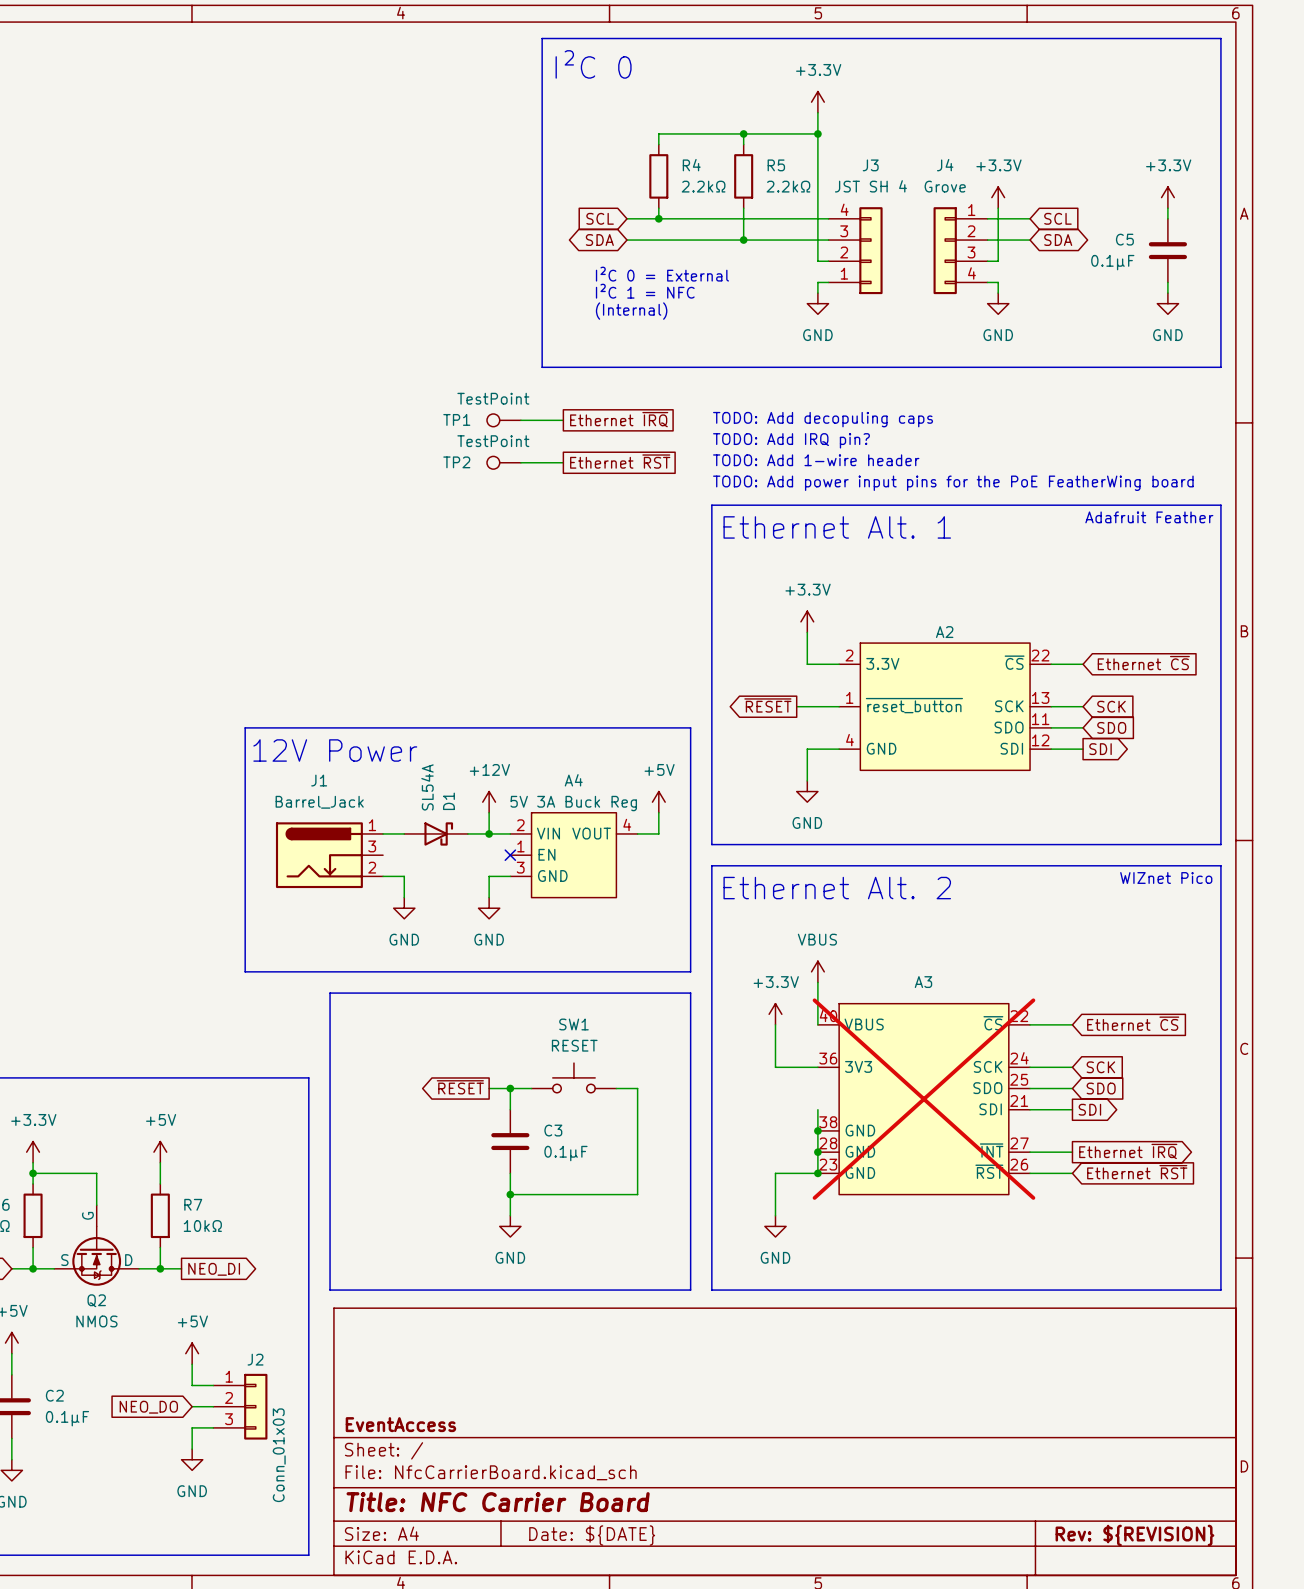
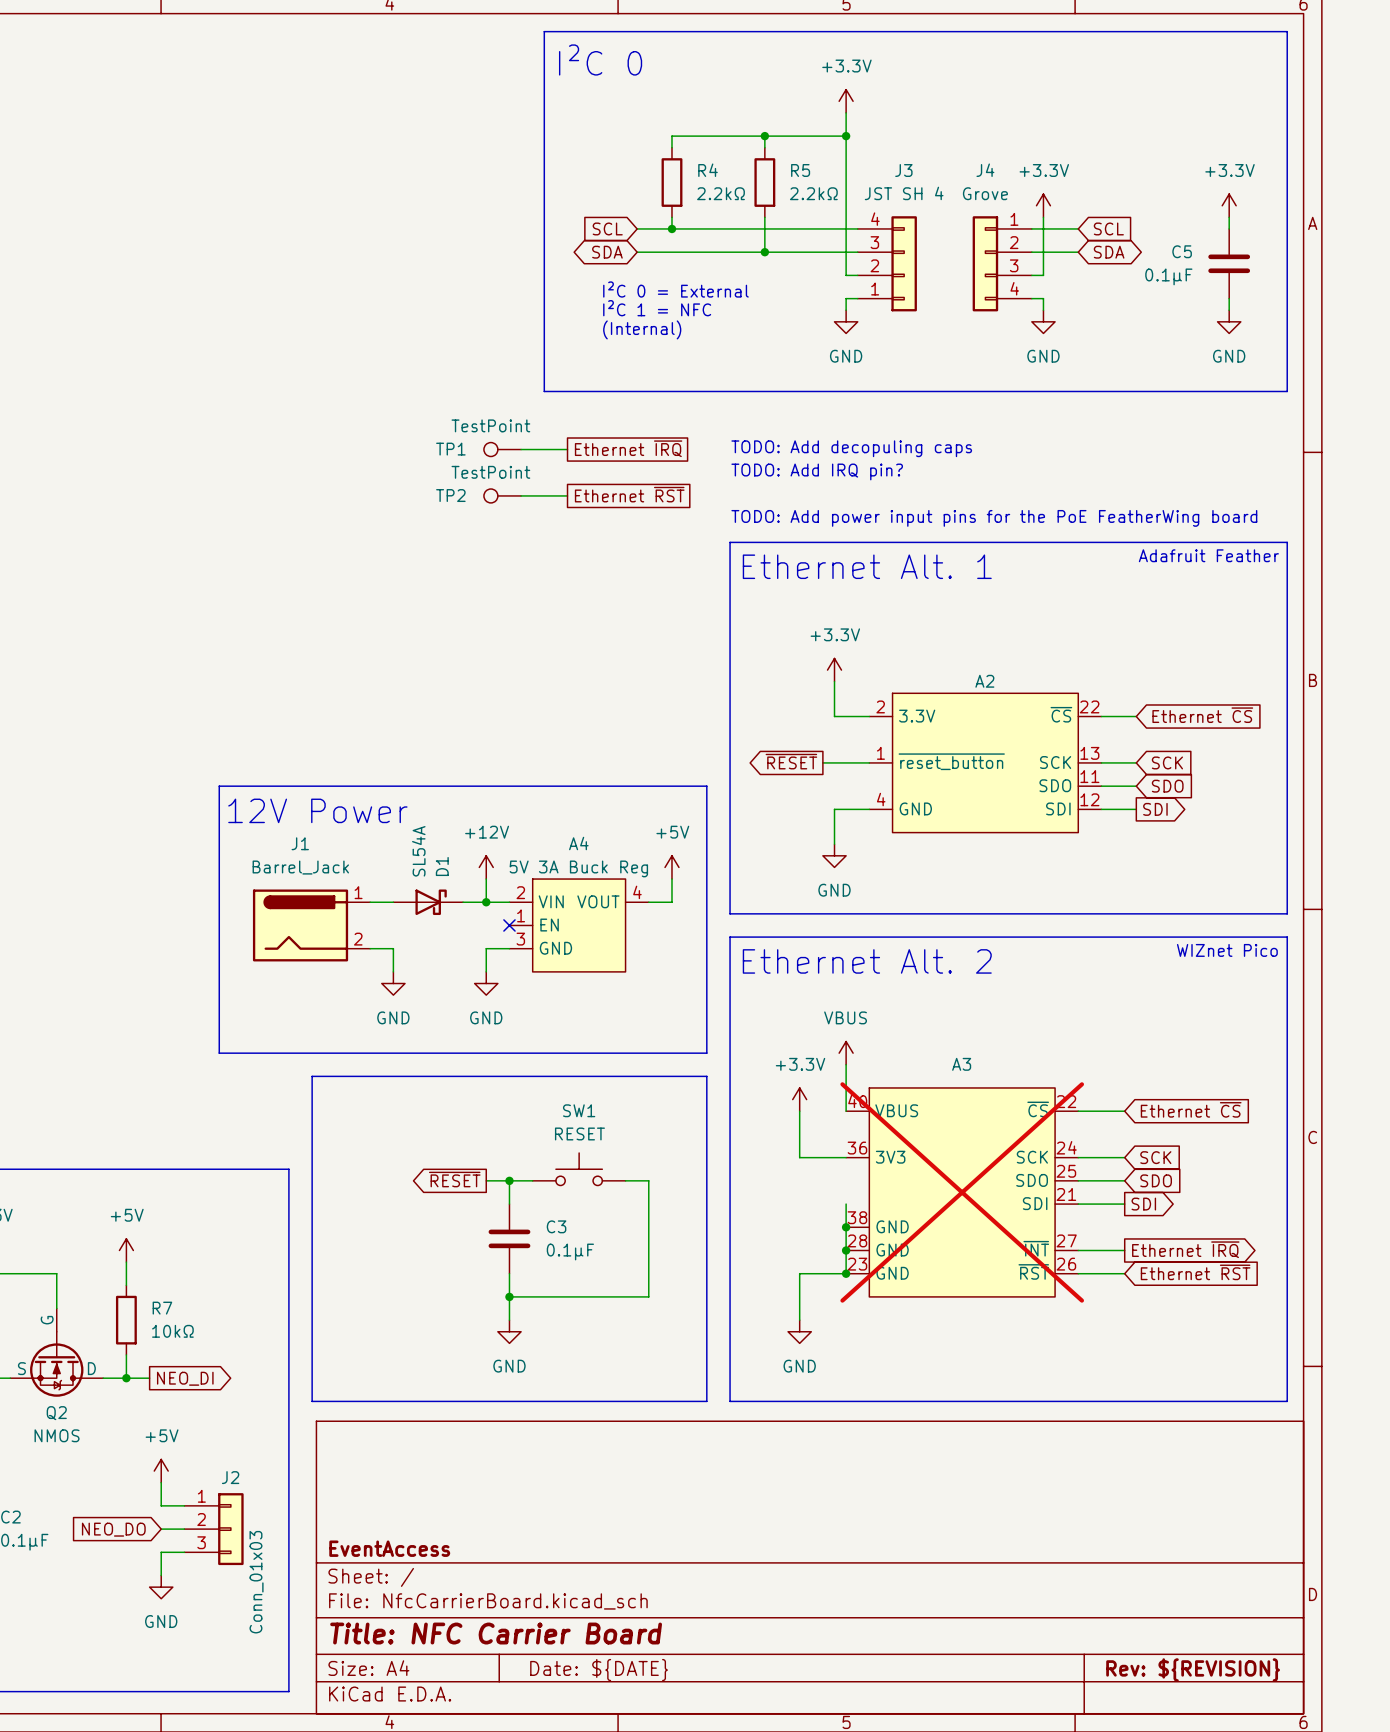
text: TODO: Add 1-wire header (816, 460) -> none
J1 symbol: [275, 822, 384, 889] -> [252, 889, 371, 962]

